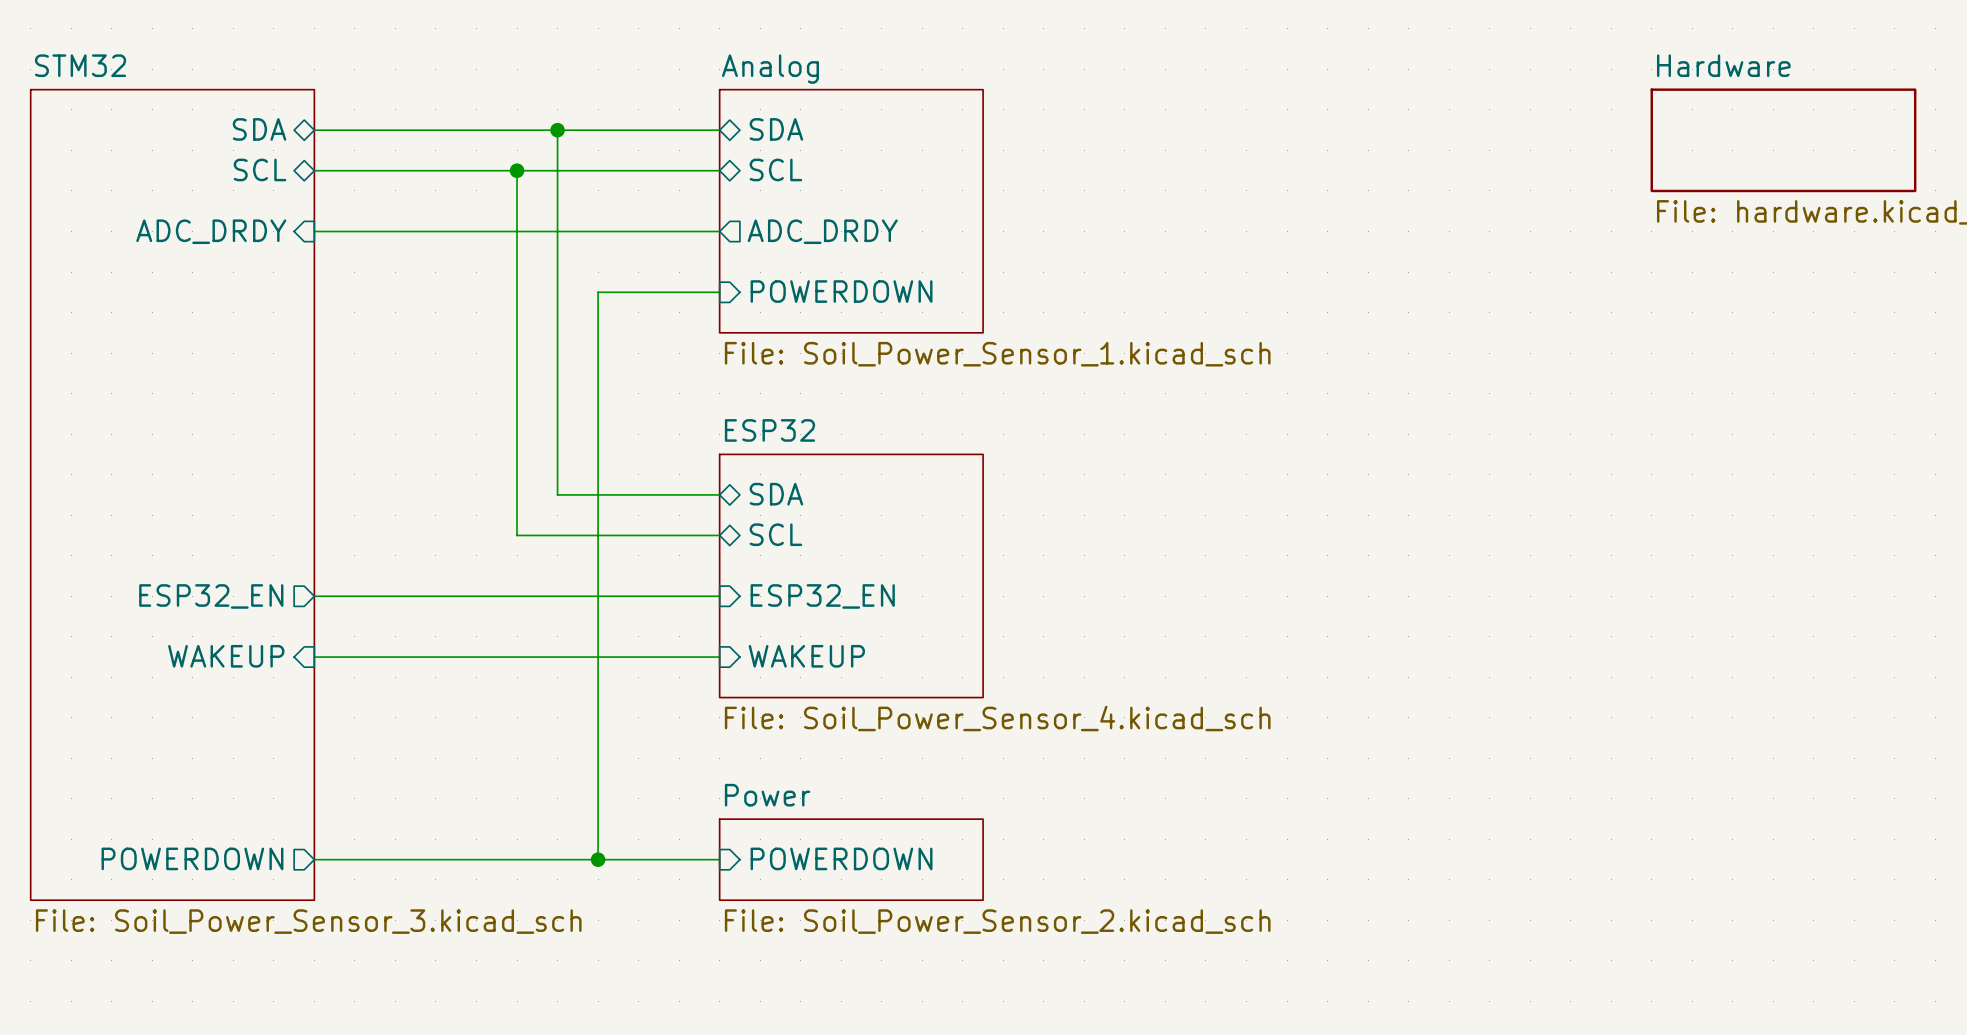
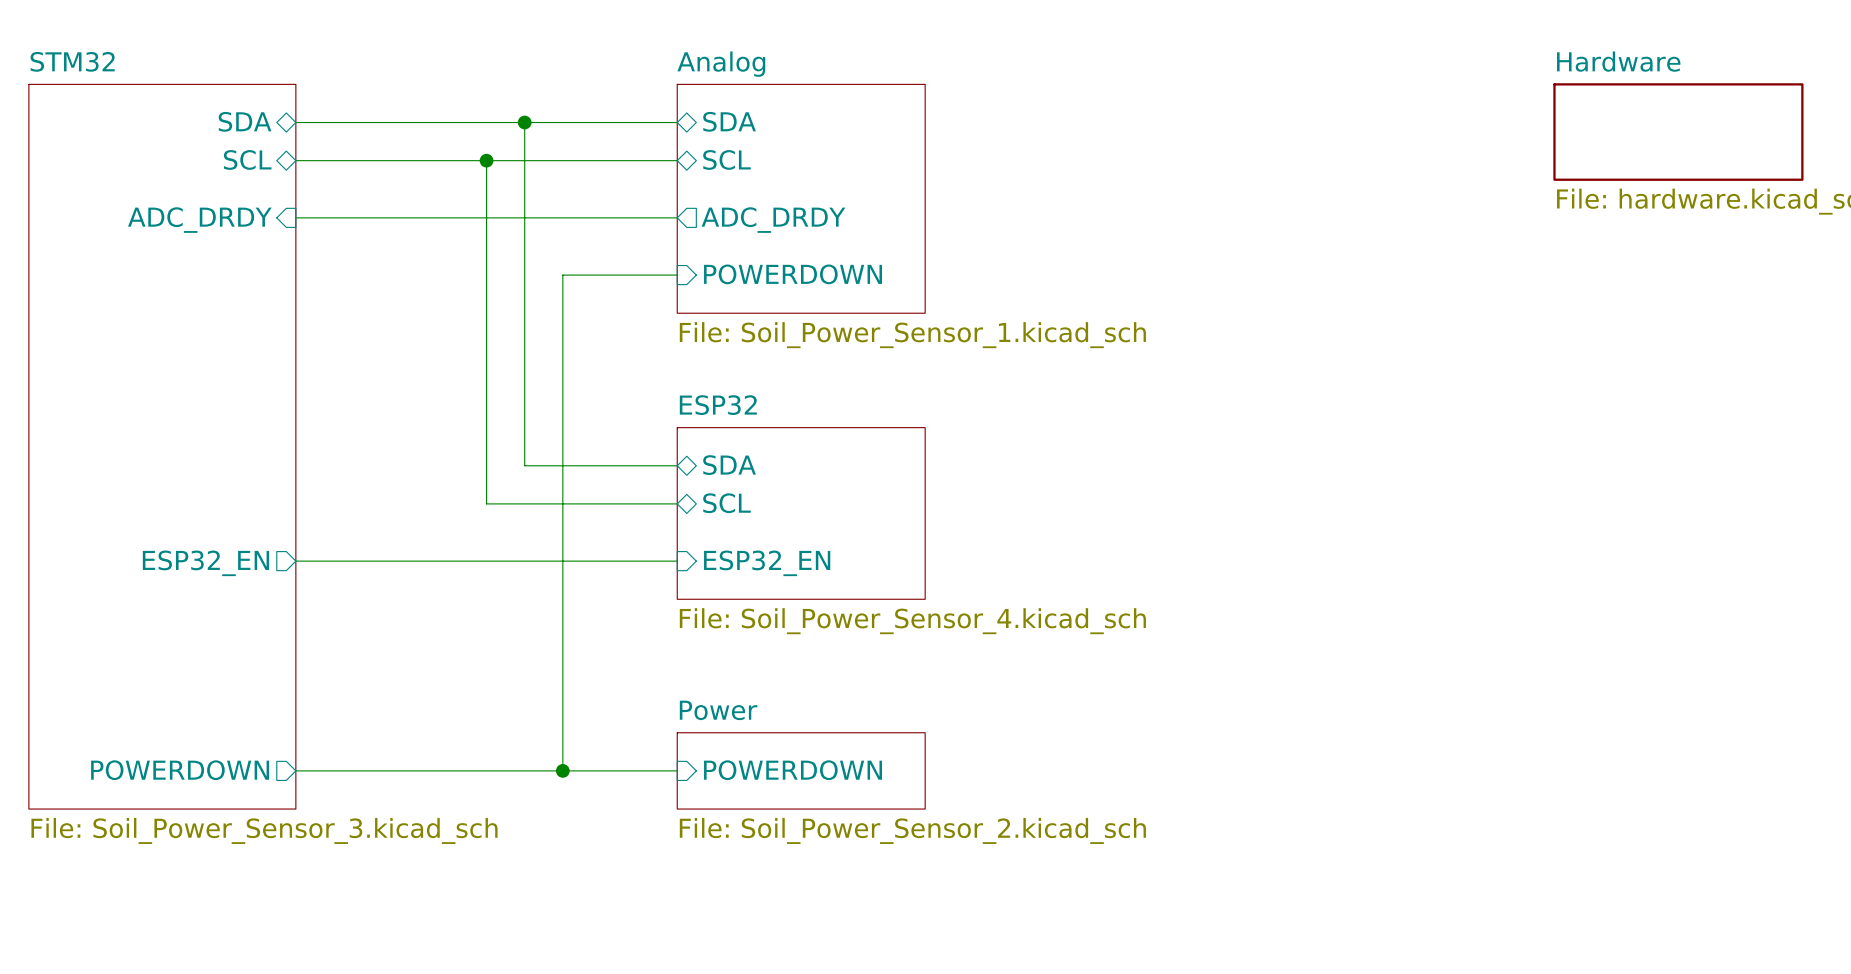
sheet STM32 shape: [30, 89, 315, 901] -> [28, 84, 296, 810]
sheet ESP32 shape: [719, 454, 984, 698] -> [677, 427, 926, 600]
sheet pin: WAKEUP (226, 656) -> none
sheet pin: WAKEUP (806, 656) -> none
wire: (314, 657) (719, 657) -> none
wire: (598, 819) (598, 859) -> none
sheet pin position: POWERDOWN (192, 858) -> POWERDOWN (180, 770)
sheet pin position: POWERDOWN (841, 858) -> POWERDOWN (793, 770)
wire: (314, 859) (719, 859) -> (295, 770) (677, 770)
junction position: (598, 859) -> (562, 770)
sheet Power position: (851, 859) -> (801, 770)

